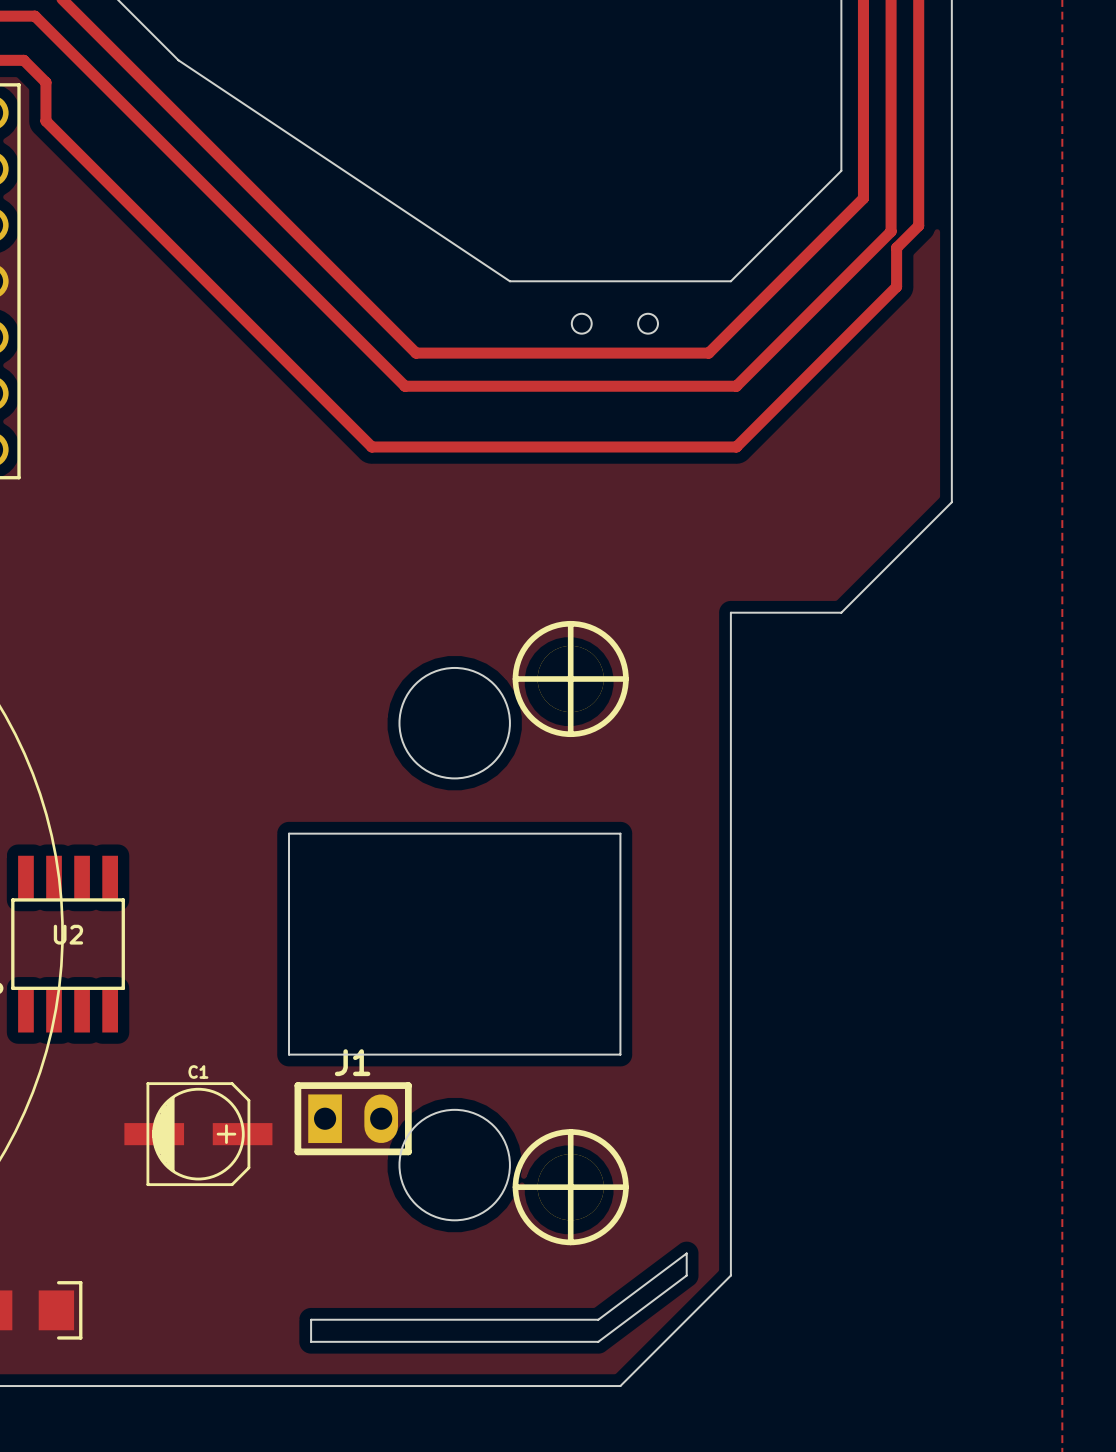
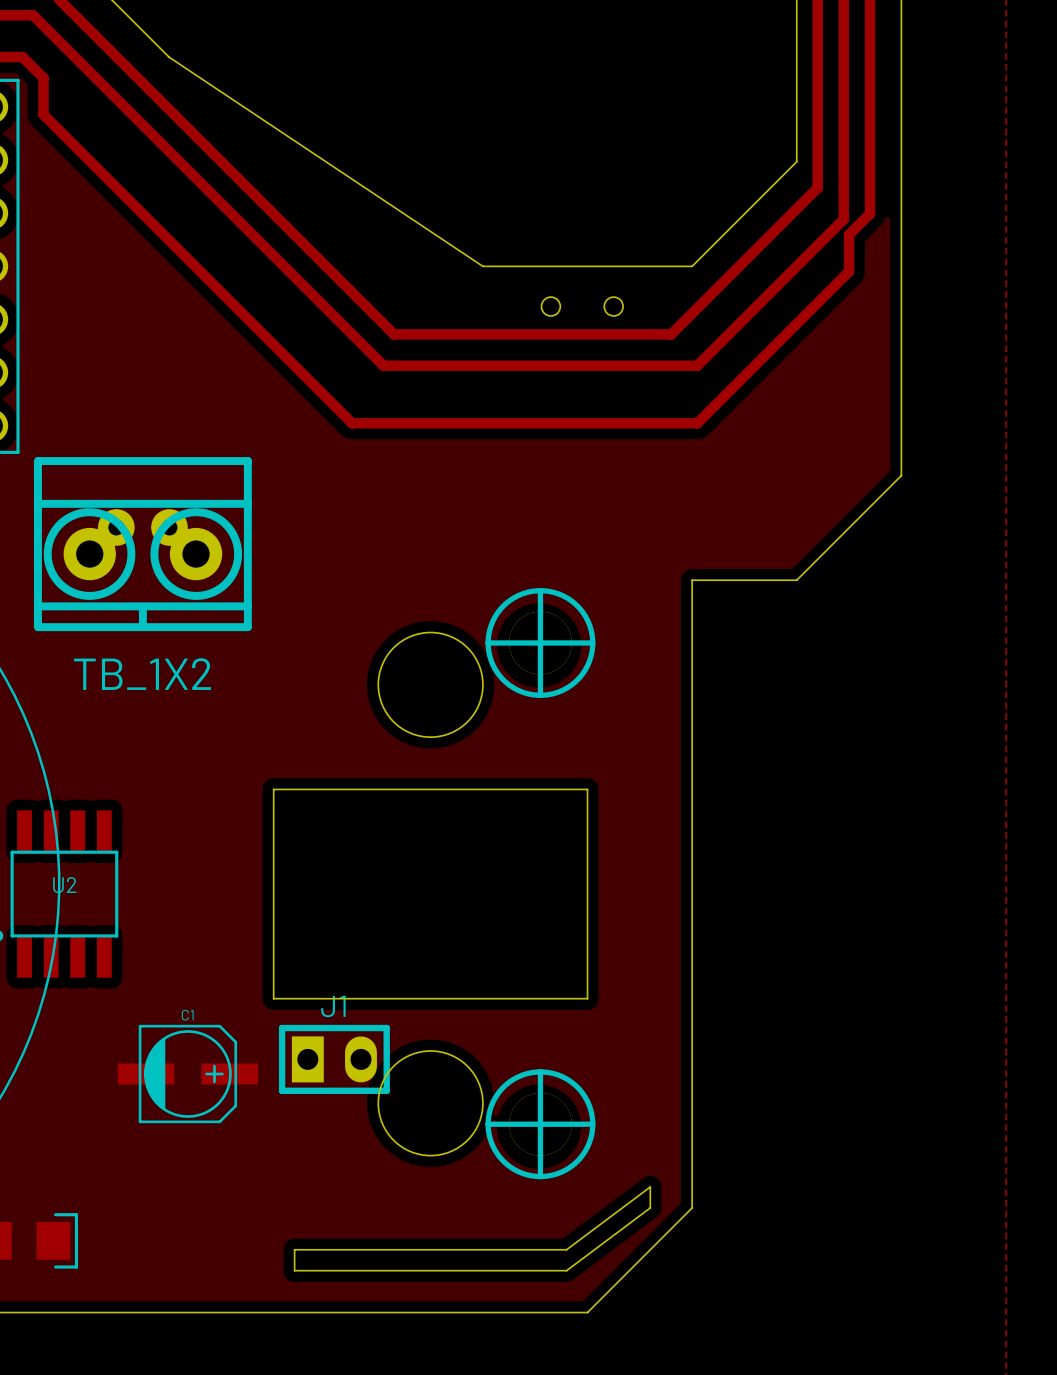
part: none -> TB_1X2 (142, 544)

